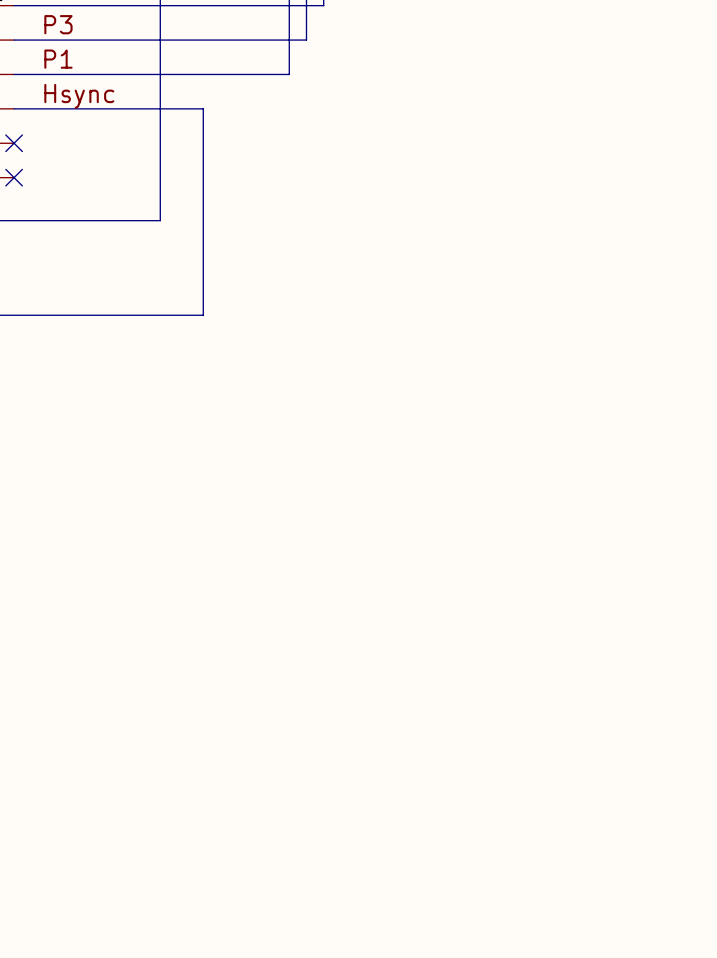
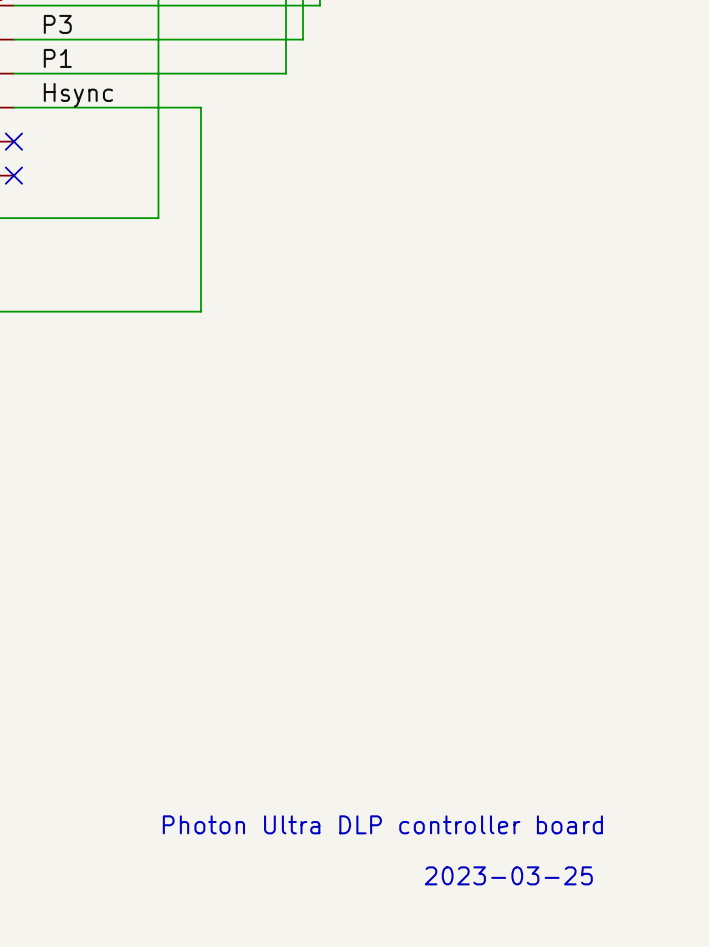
text: none -> Photon Ultra DLP controller board (382, 824)
text: none -> 2023-03-25 (508, 875)

